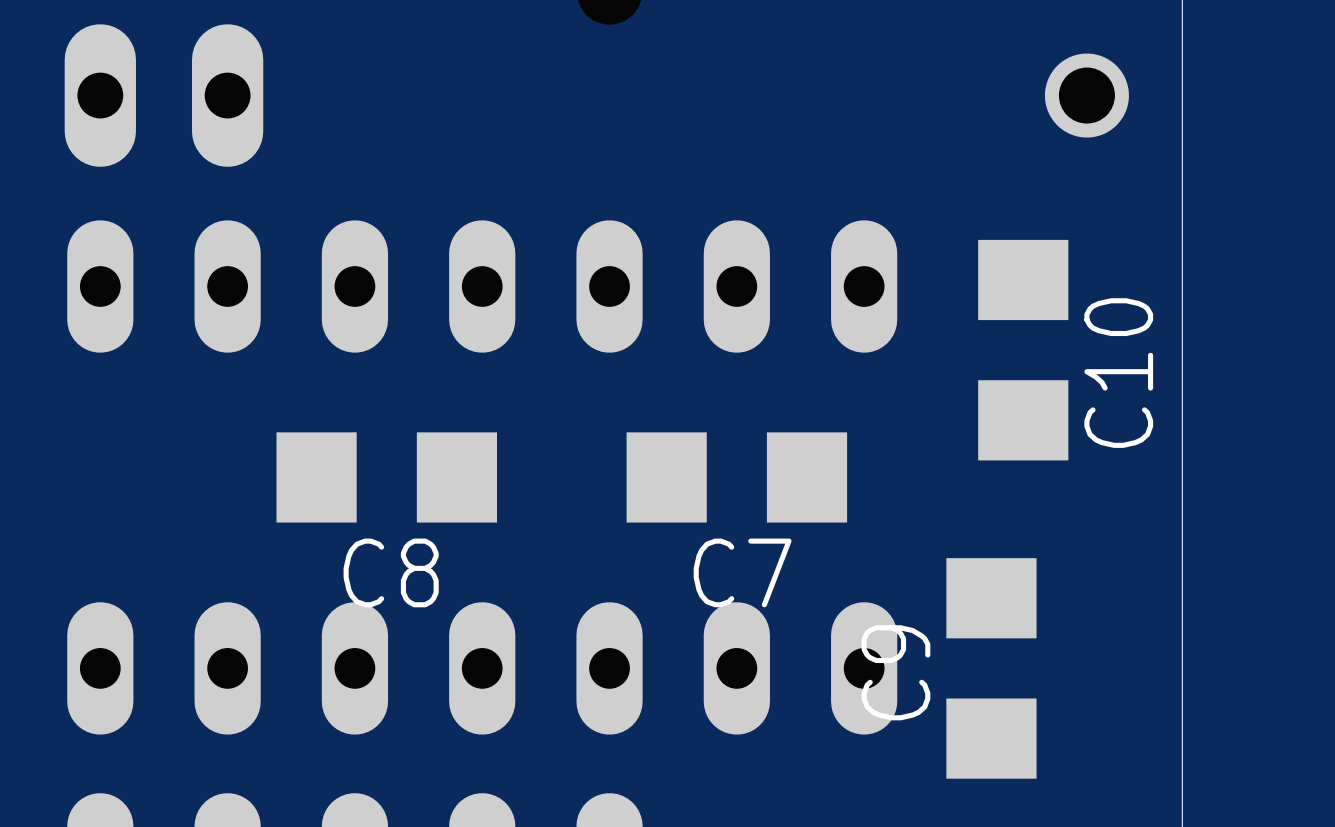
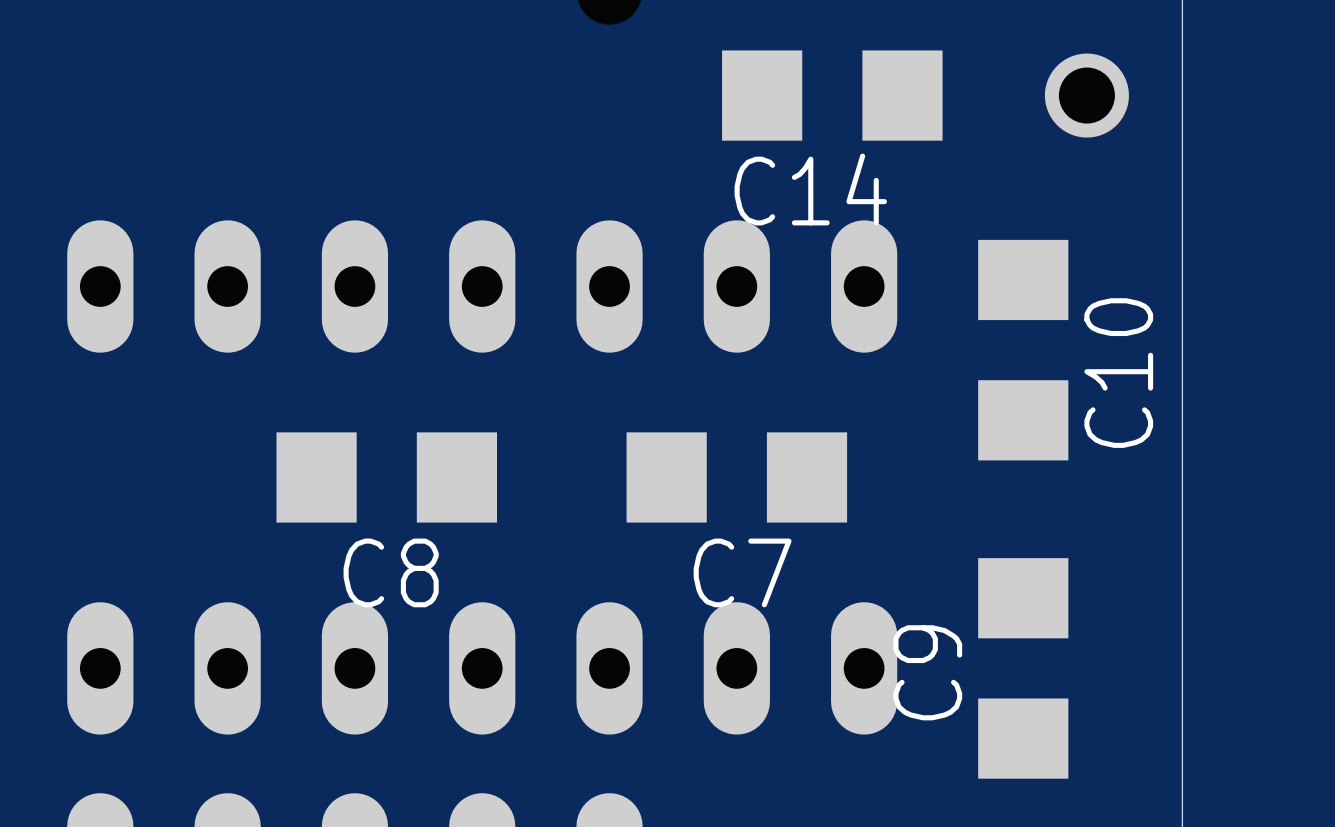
part: (163, 95) -> none
C14: none -> (832, 95)
C9 position: (991, 668) -> (1023, 668)

